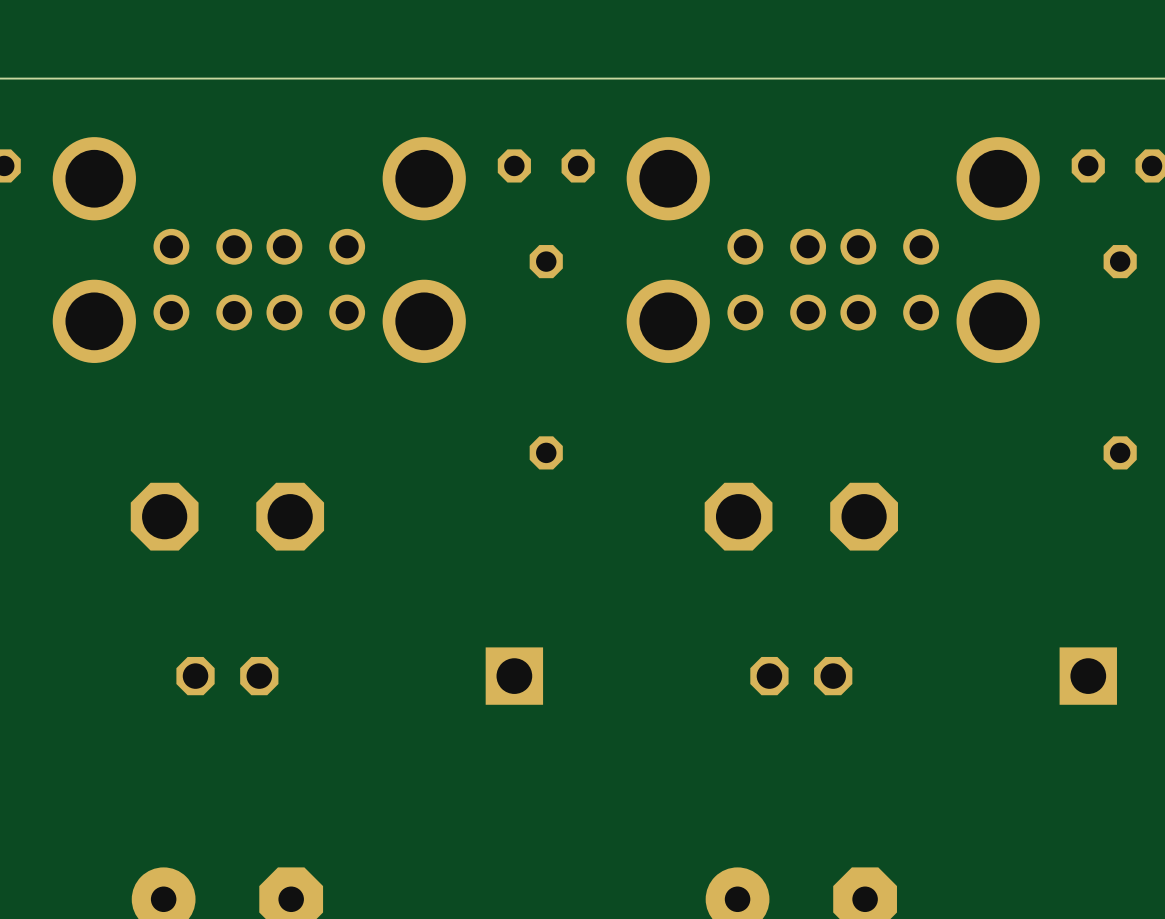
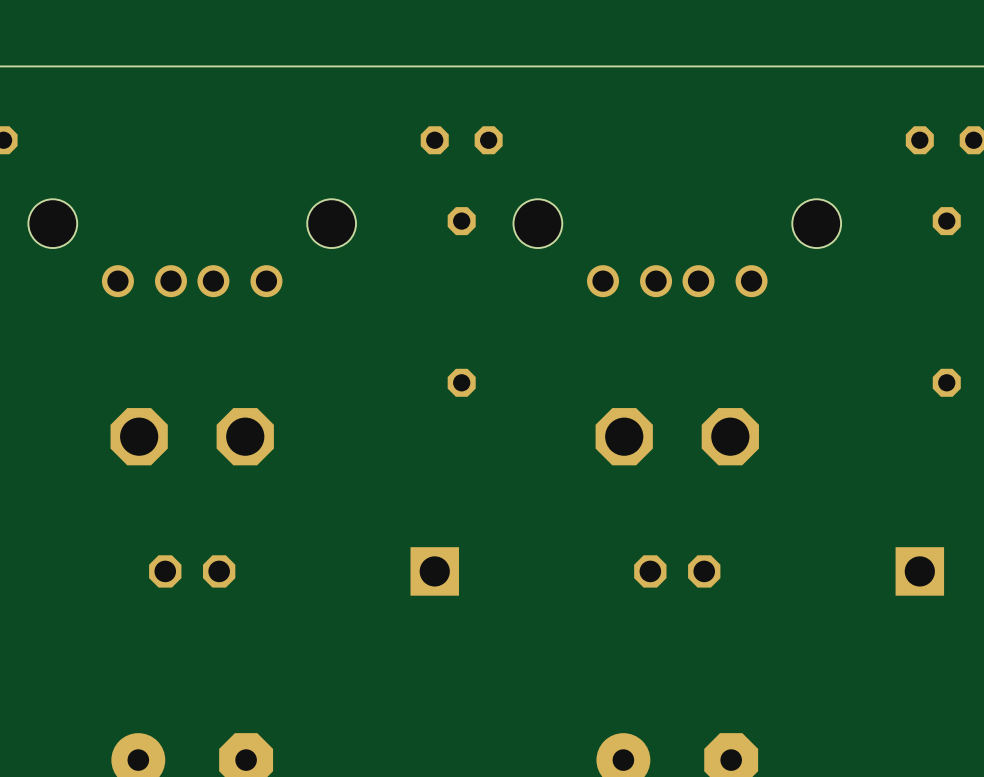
part: (259, 250) -> none
part: (833, 250) -> none
part: none -> (192, 248)
part: none -> (677, 248)

